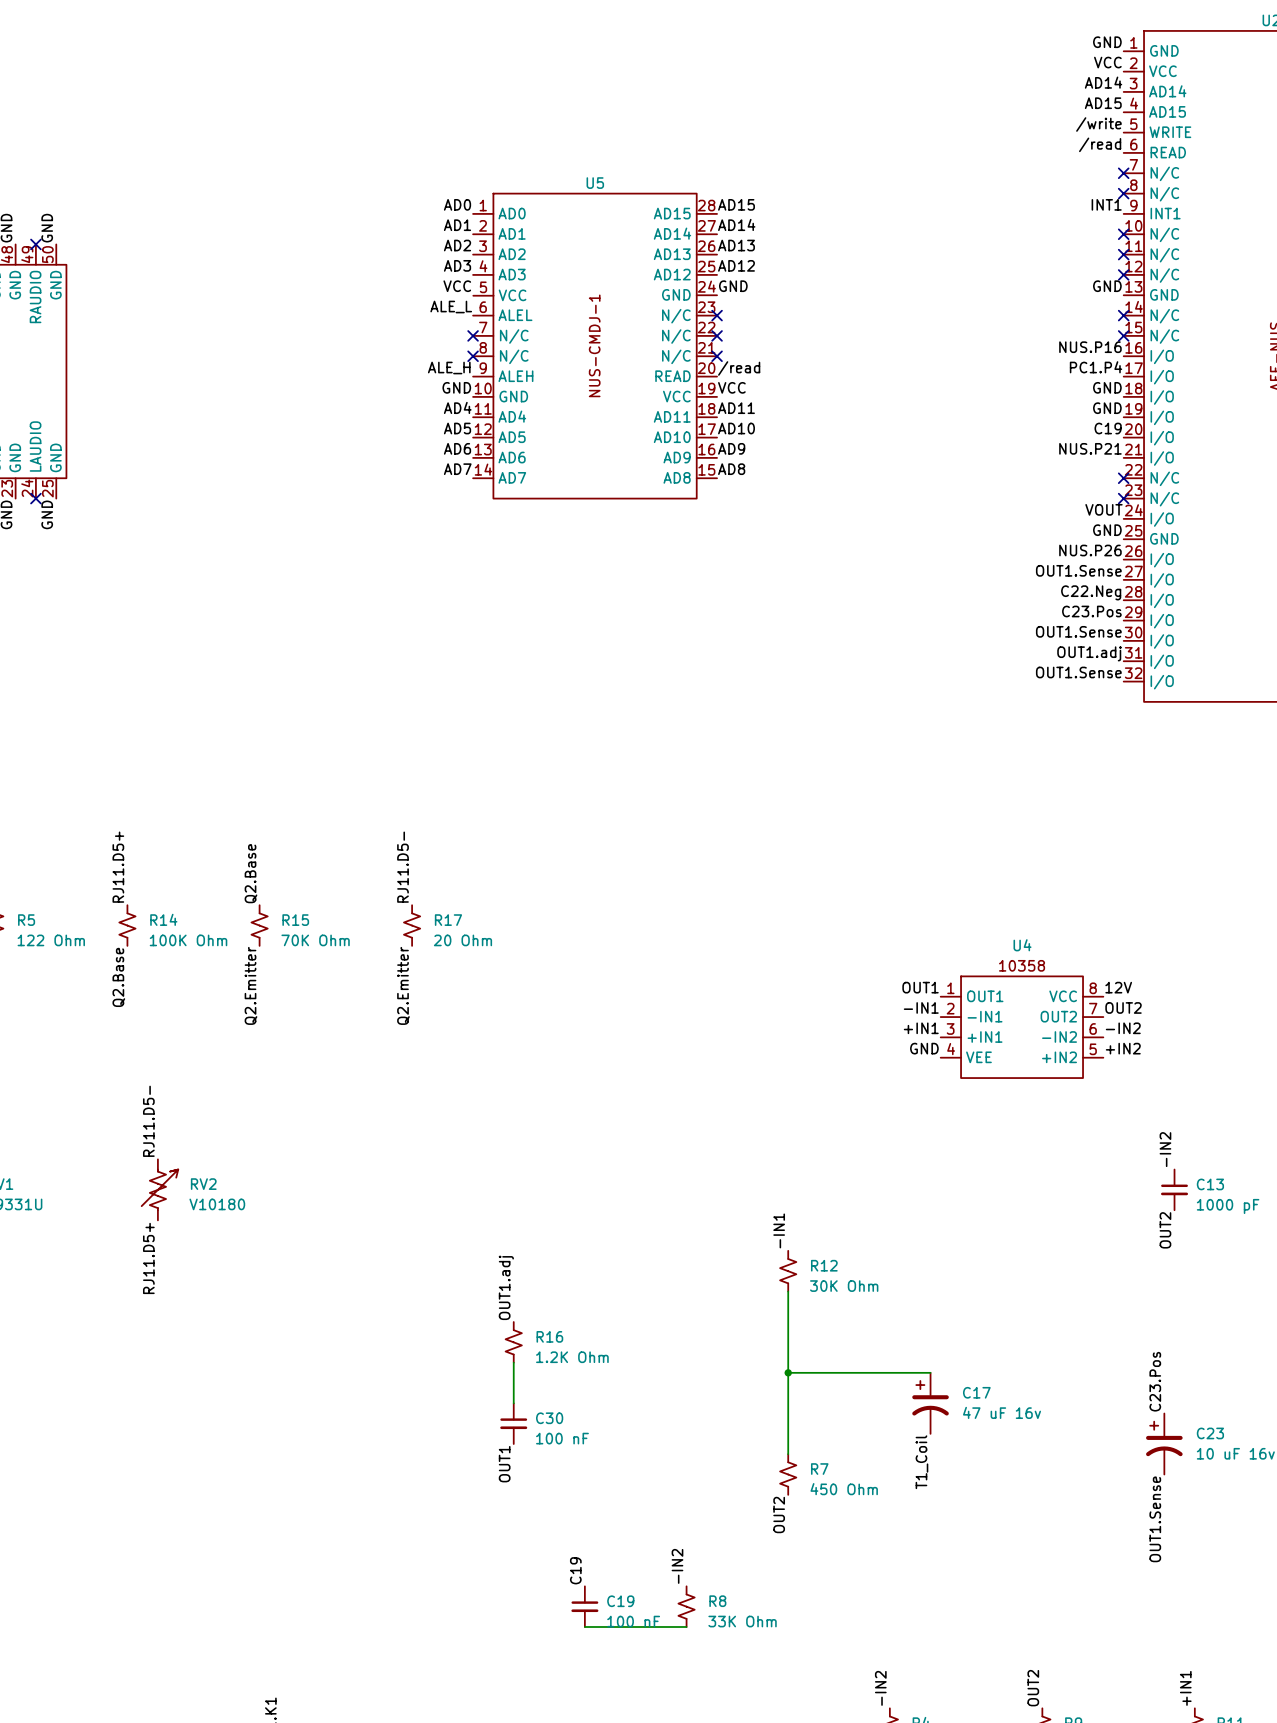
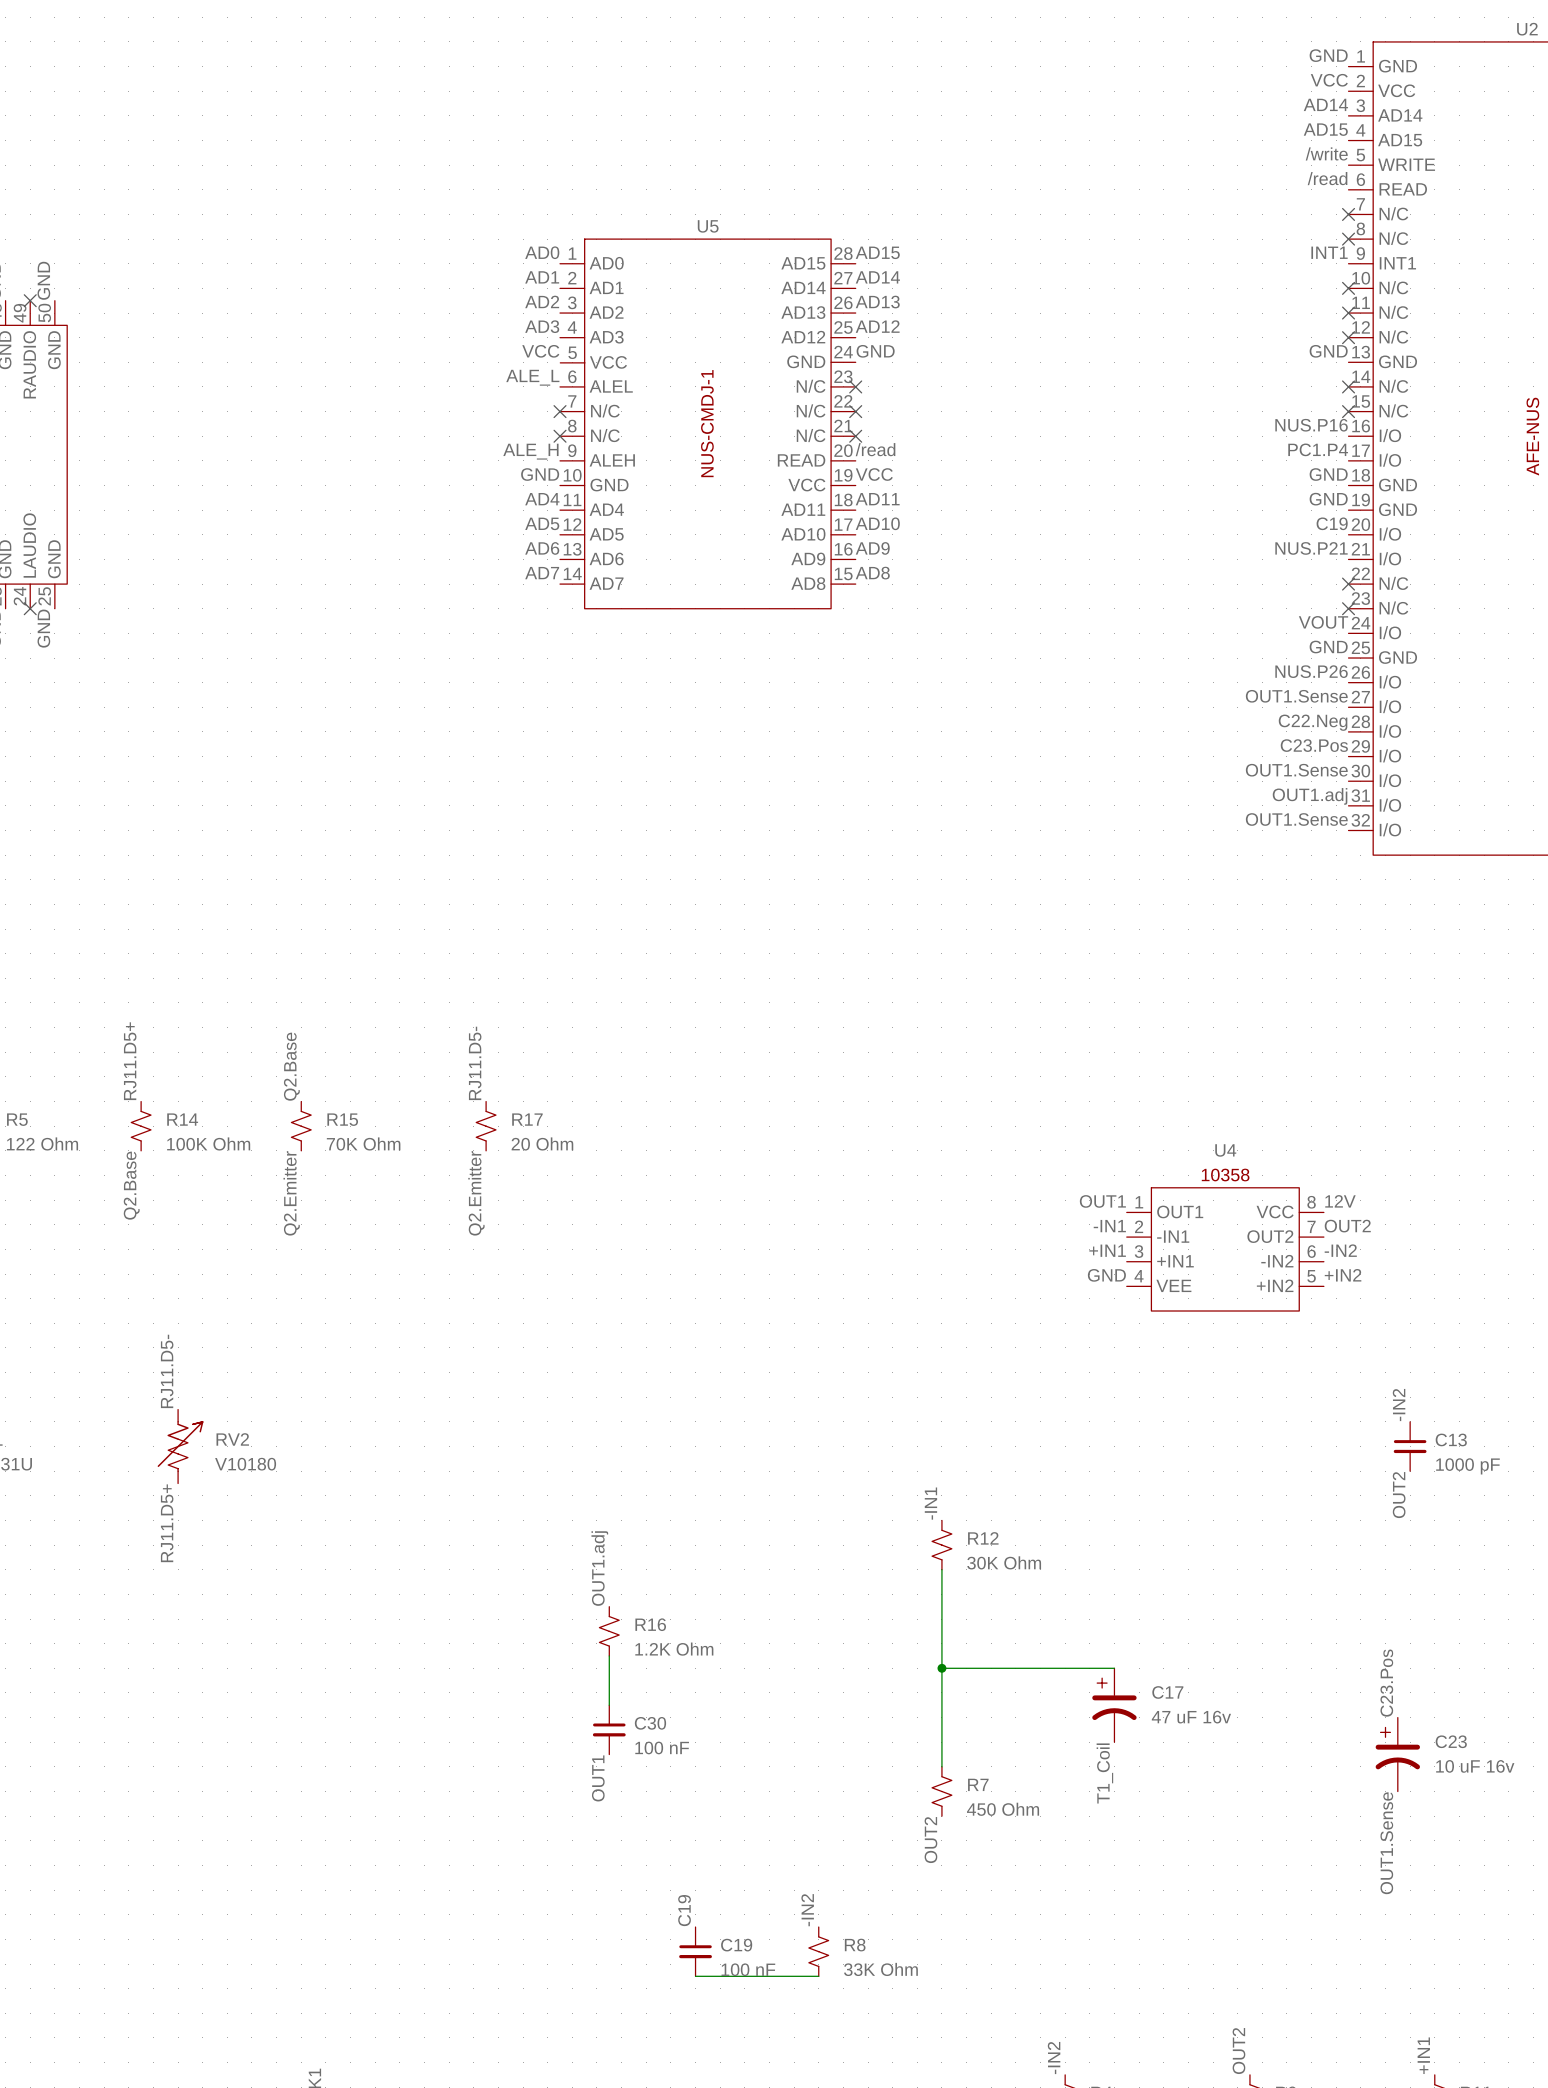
U2 pin name: I/O (1162, 397) -> GND (1398, 485)
U2 pin name: I/O (1162, 417) -> GND (1398, 509)

